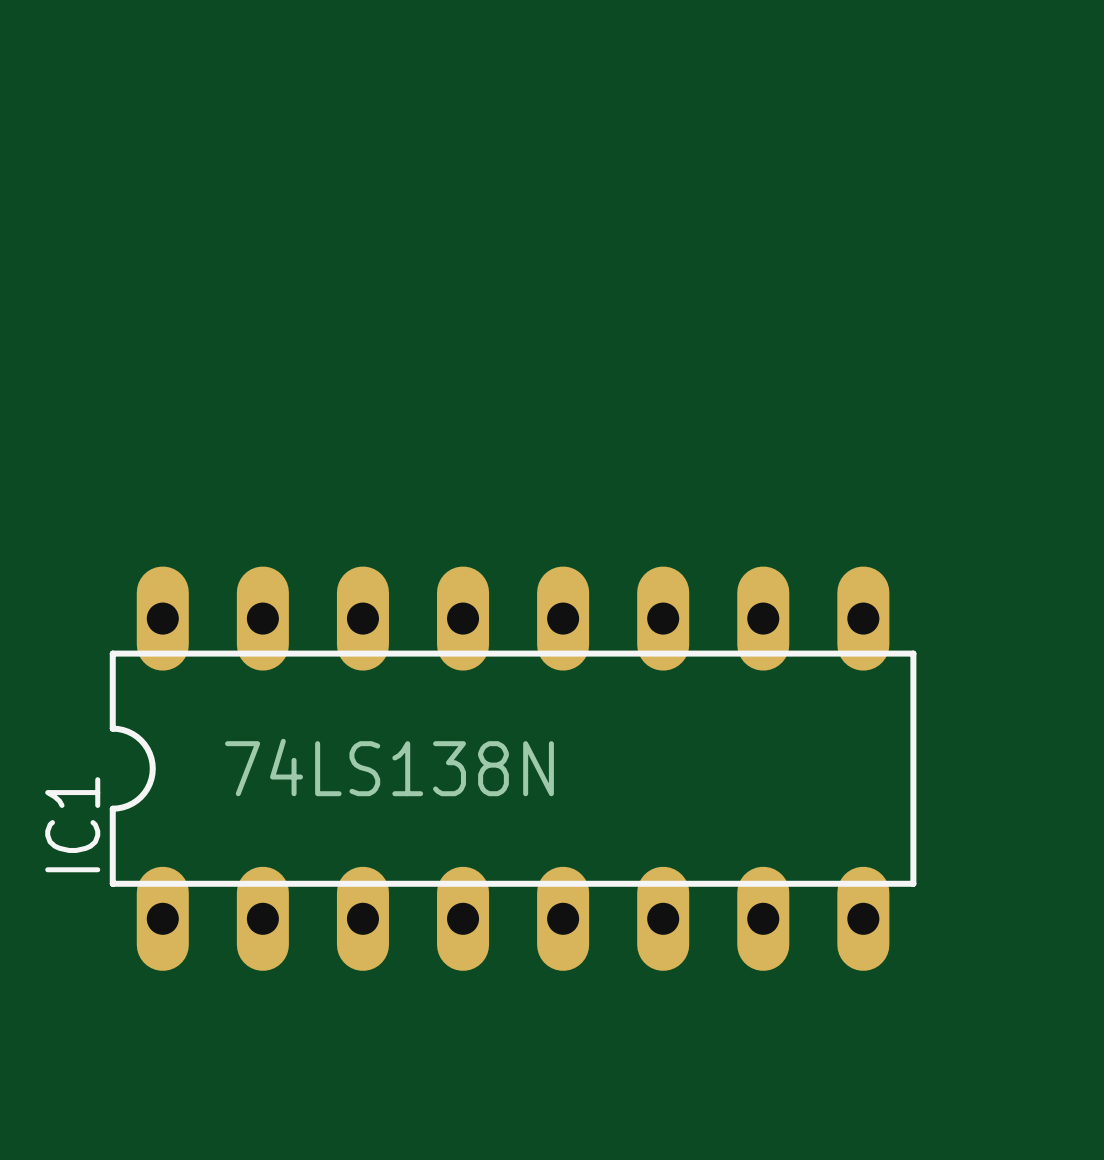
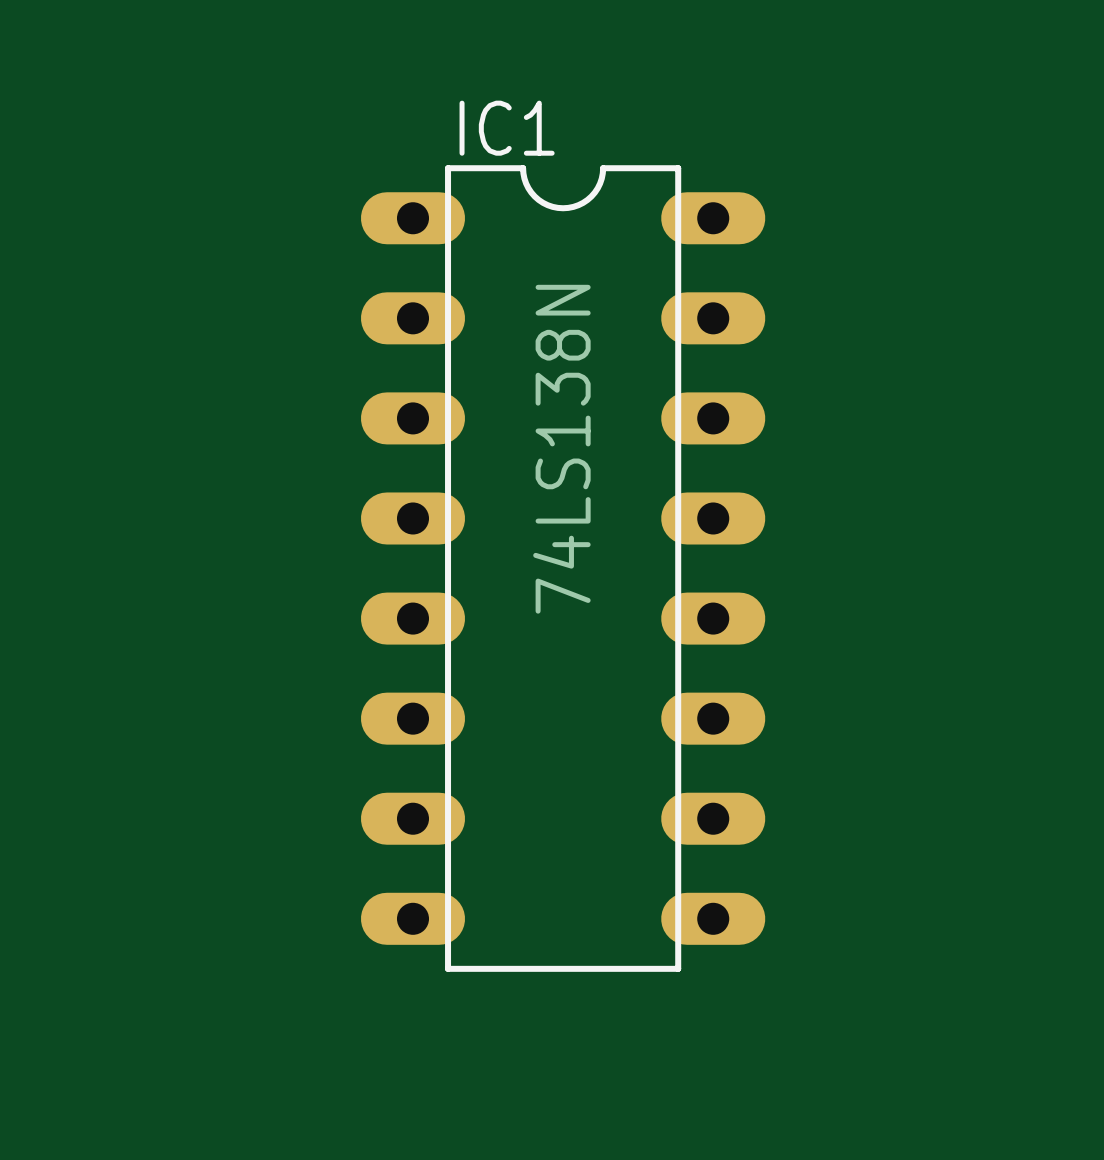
IC1 rotation: 0° (513, 768) -> 90° clockwise (563, 568)

